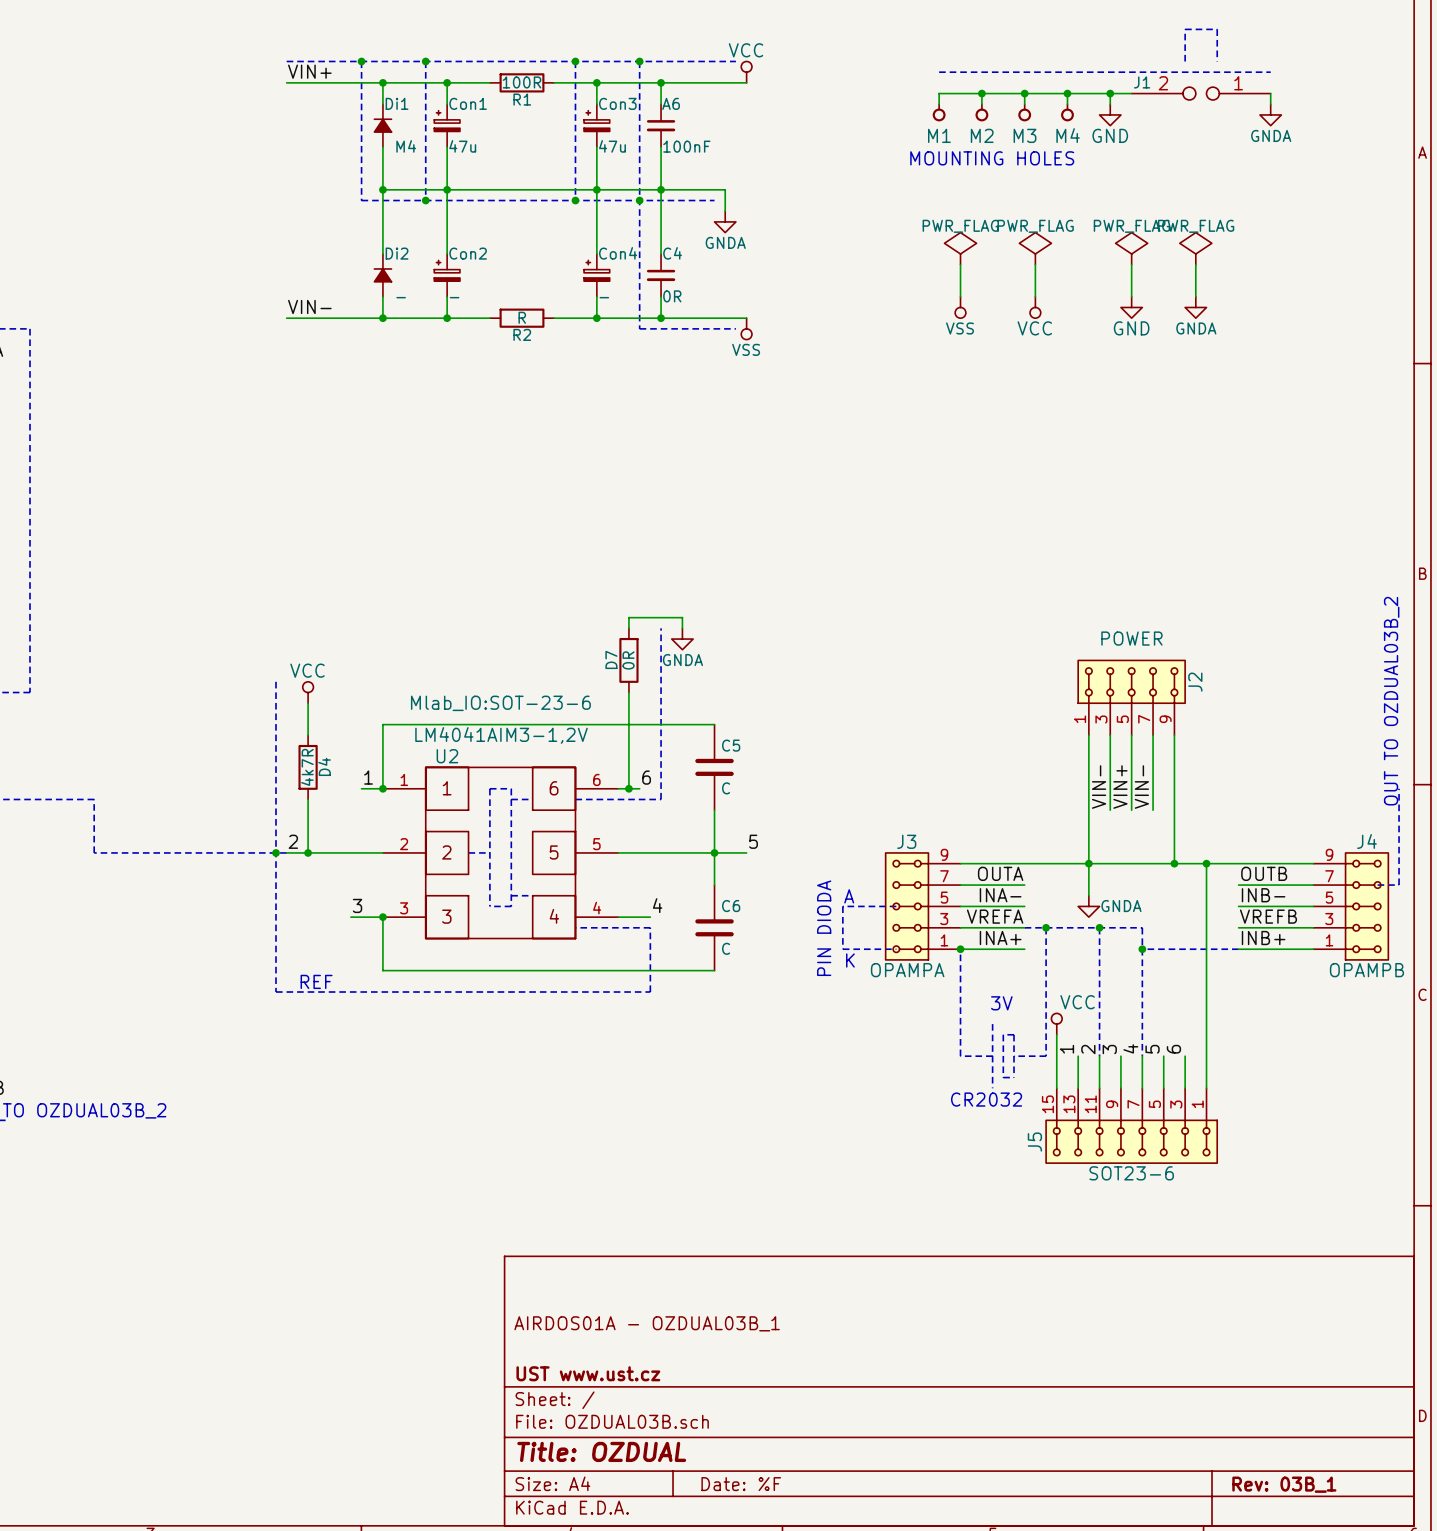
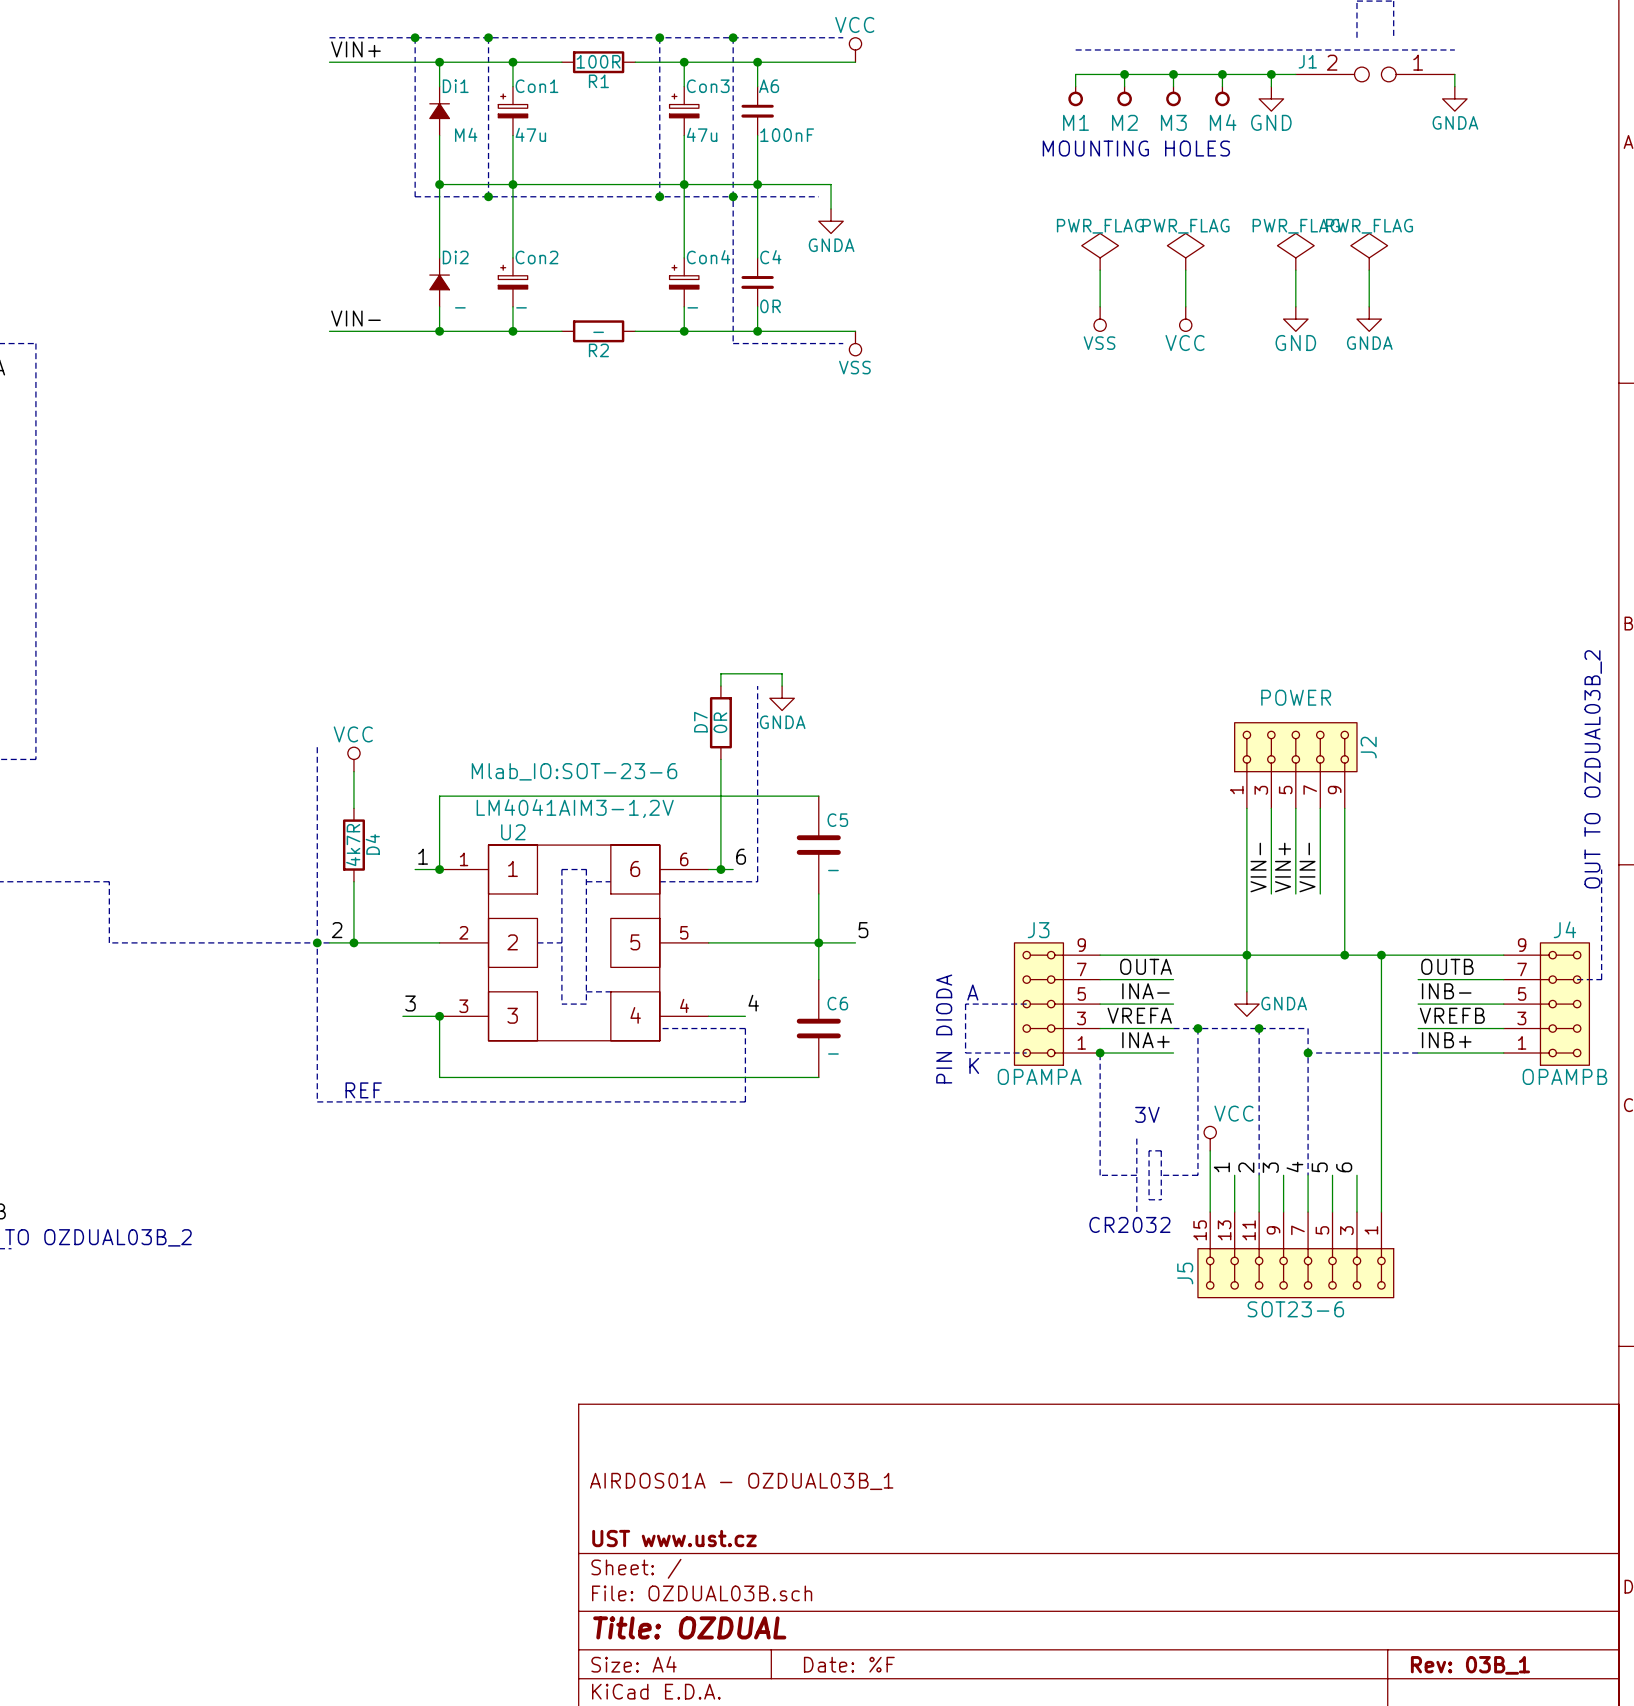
R2 value: R (522, 317) -> - (598, 332)
C5 value: C (726, 788) -> - (833, 870)
C6 value: C (726, 948) -> - (833, 1054)

